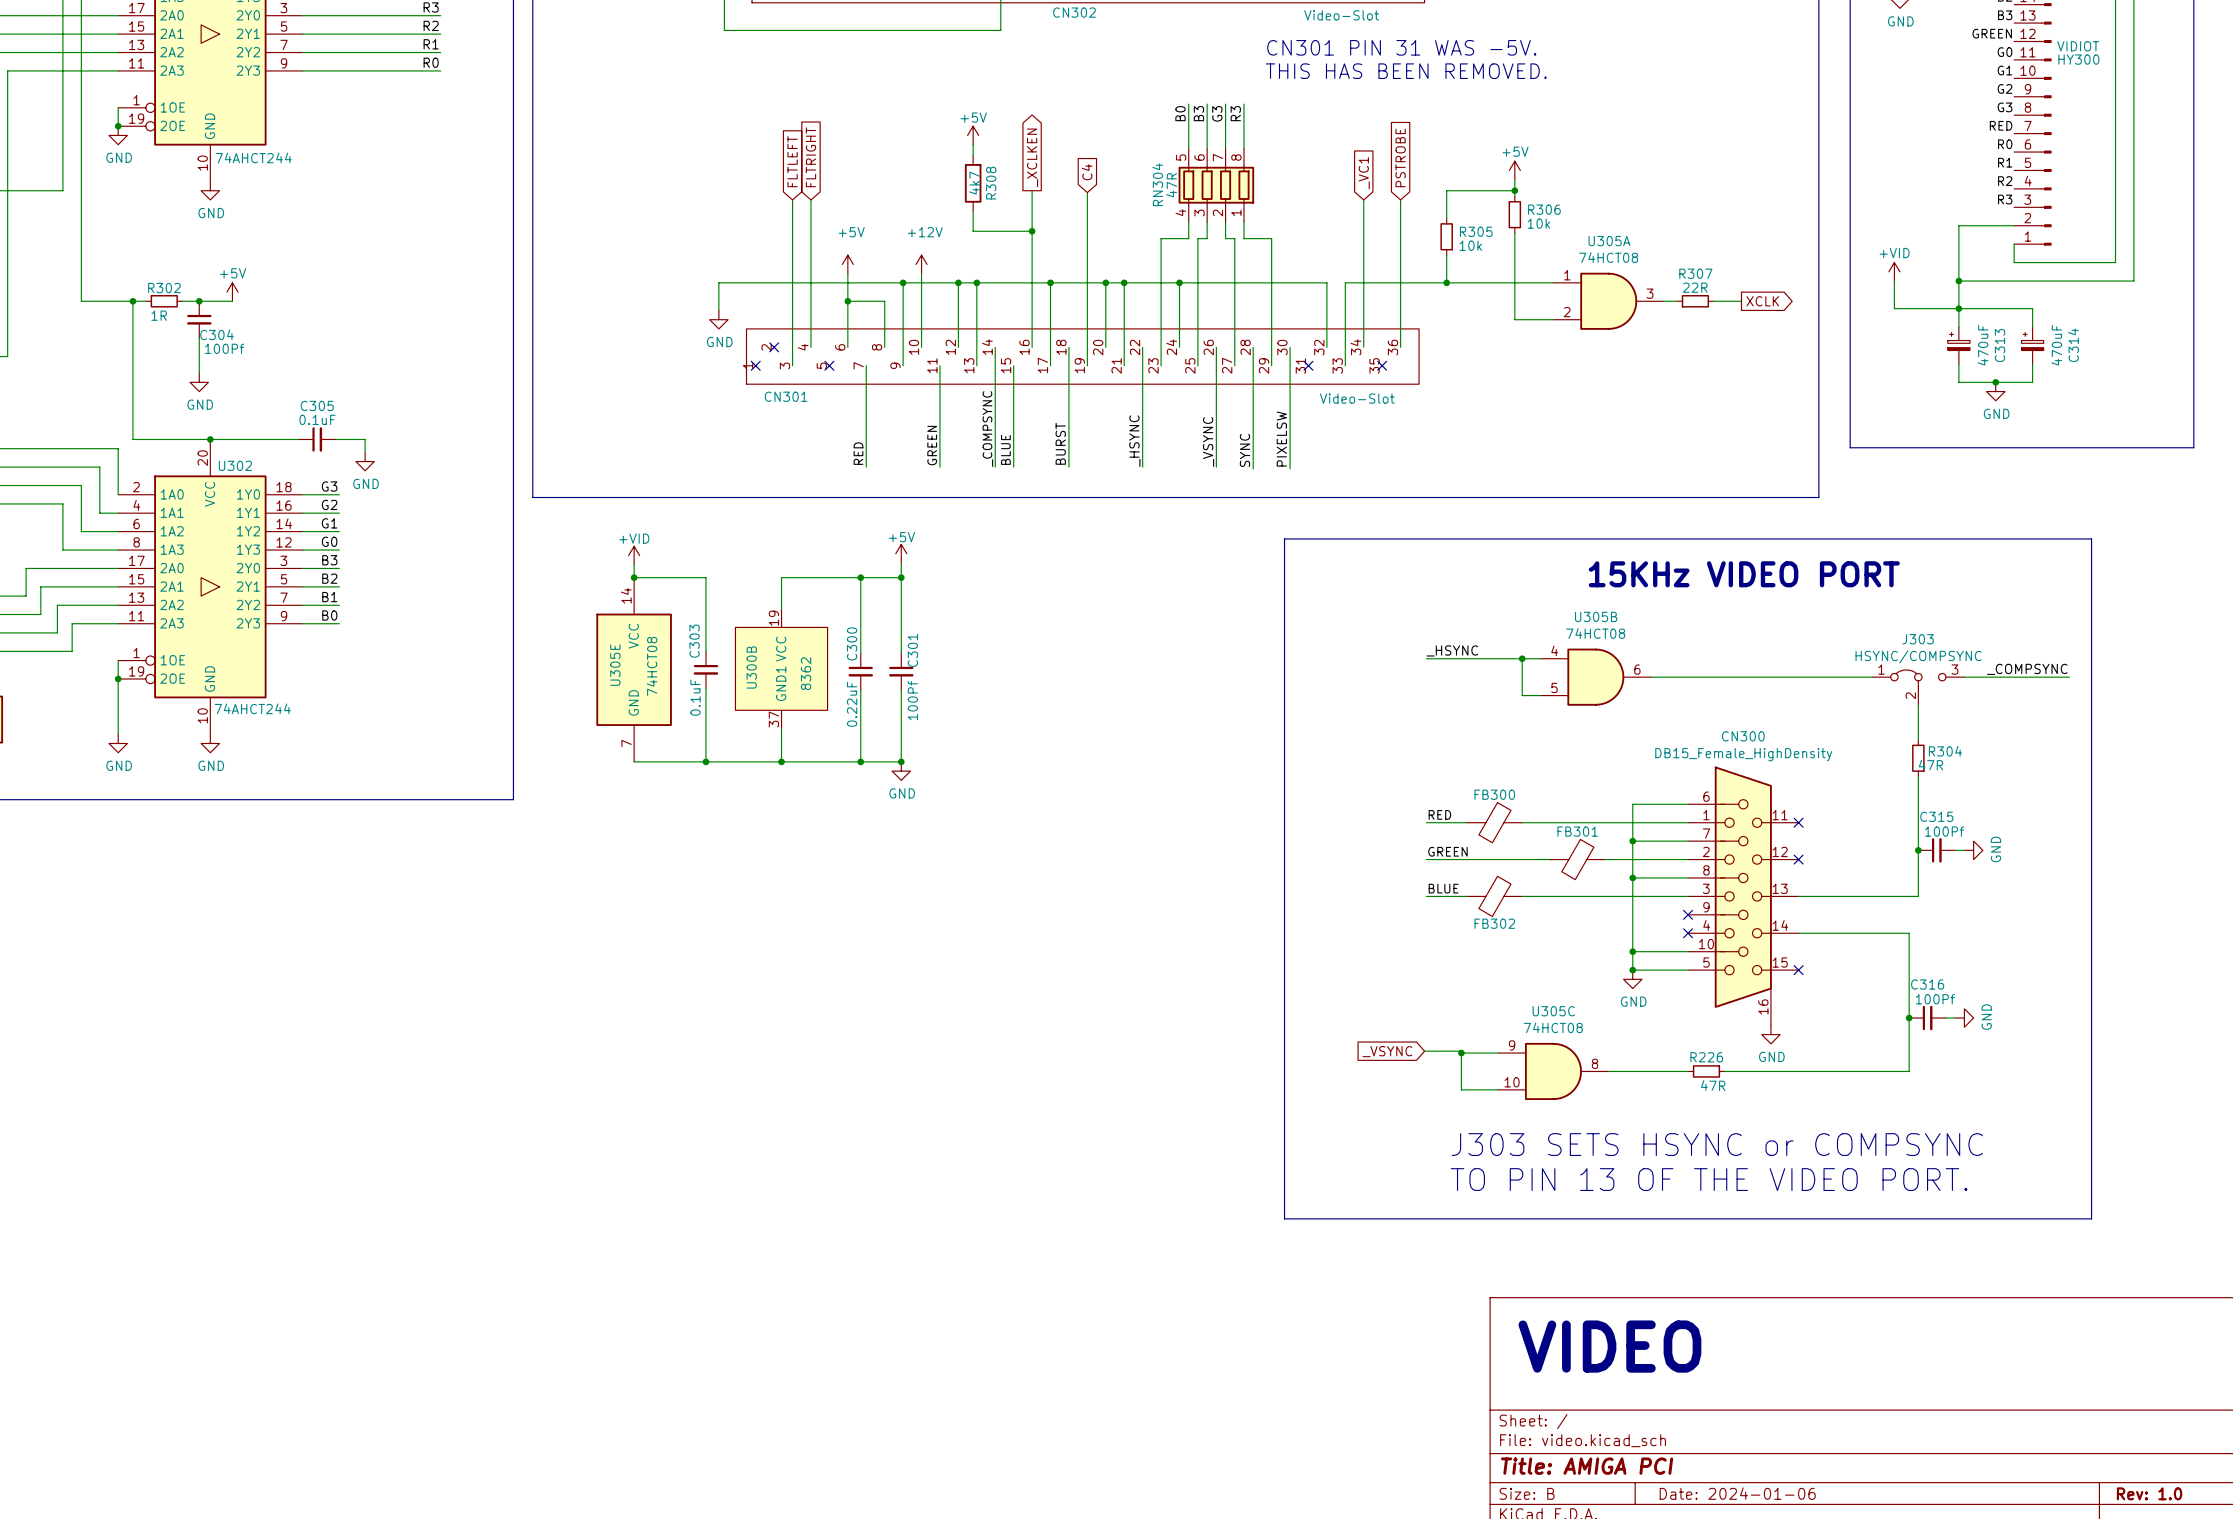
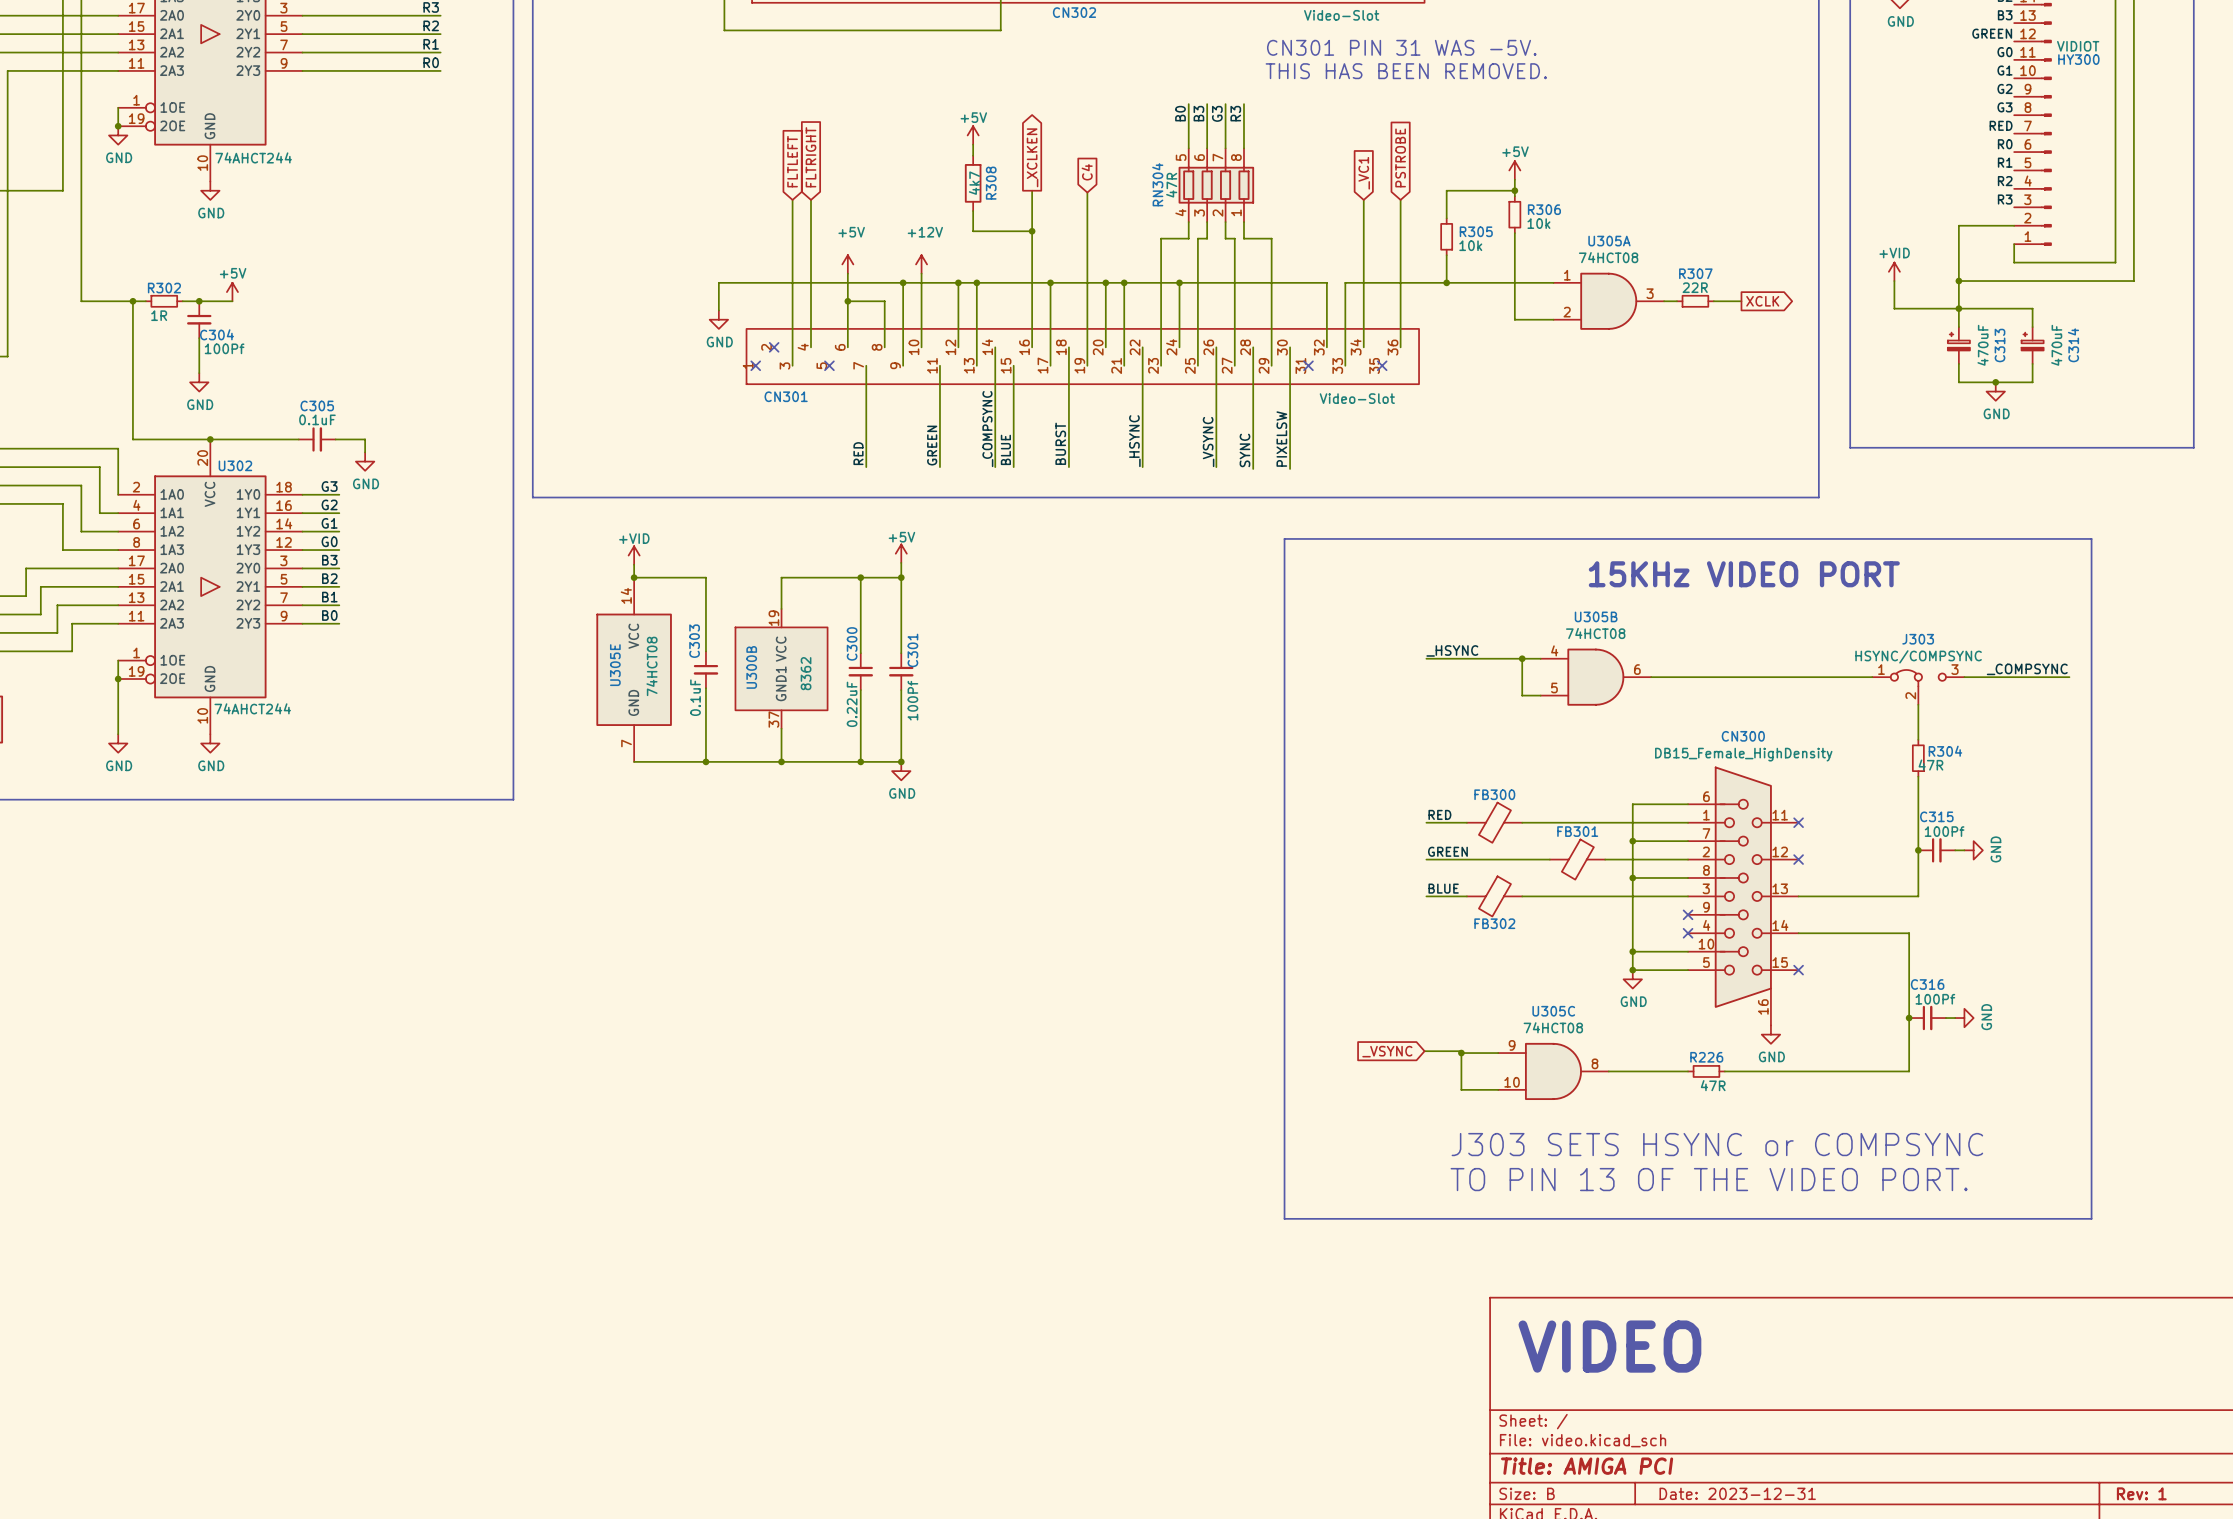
title block: Date: 2024-01-06 (1737, 1493) -> Date: 2023-12-31 (1737, 1493)
title block: Rev: 1.0 (2149, 1493) -> Rev: 1 (2141, 1493)

